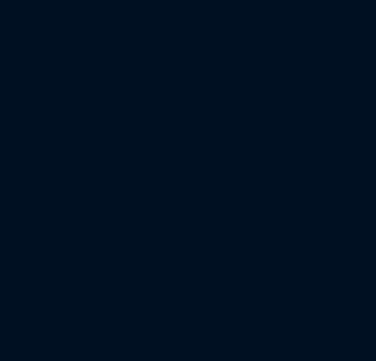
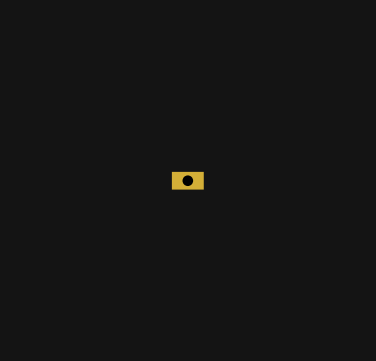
part: none -> (187, 180)

